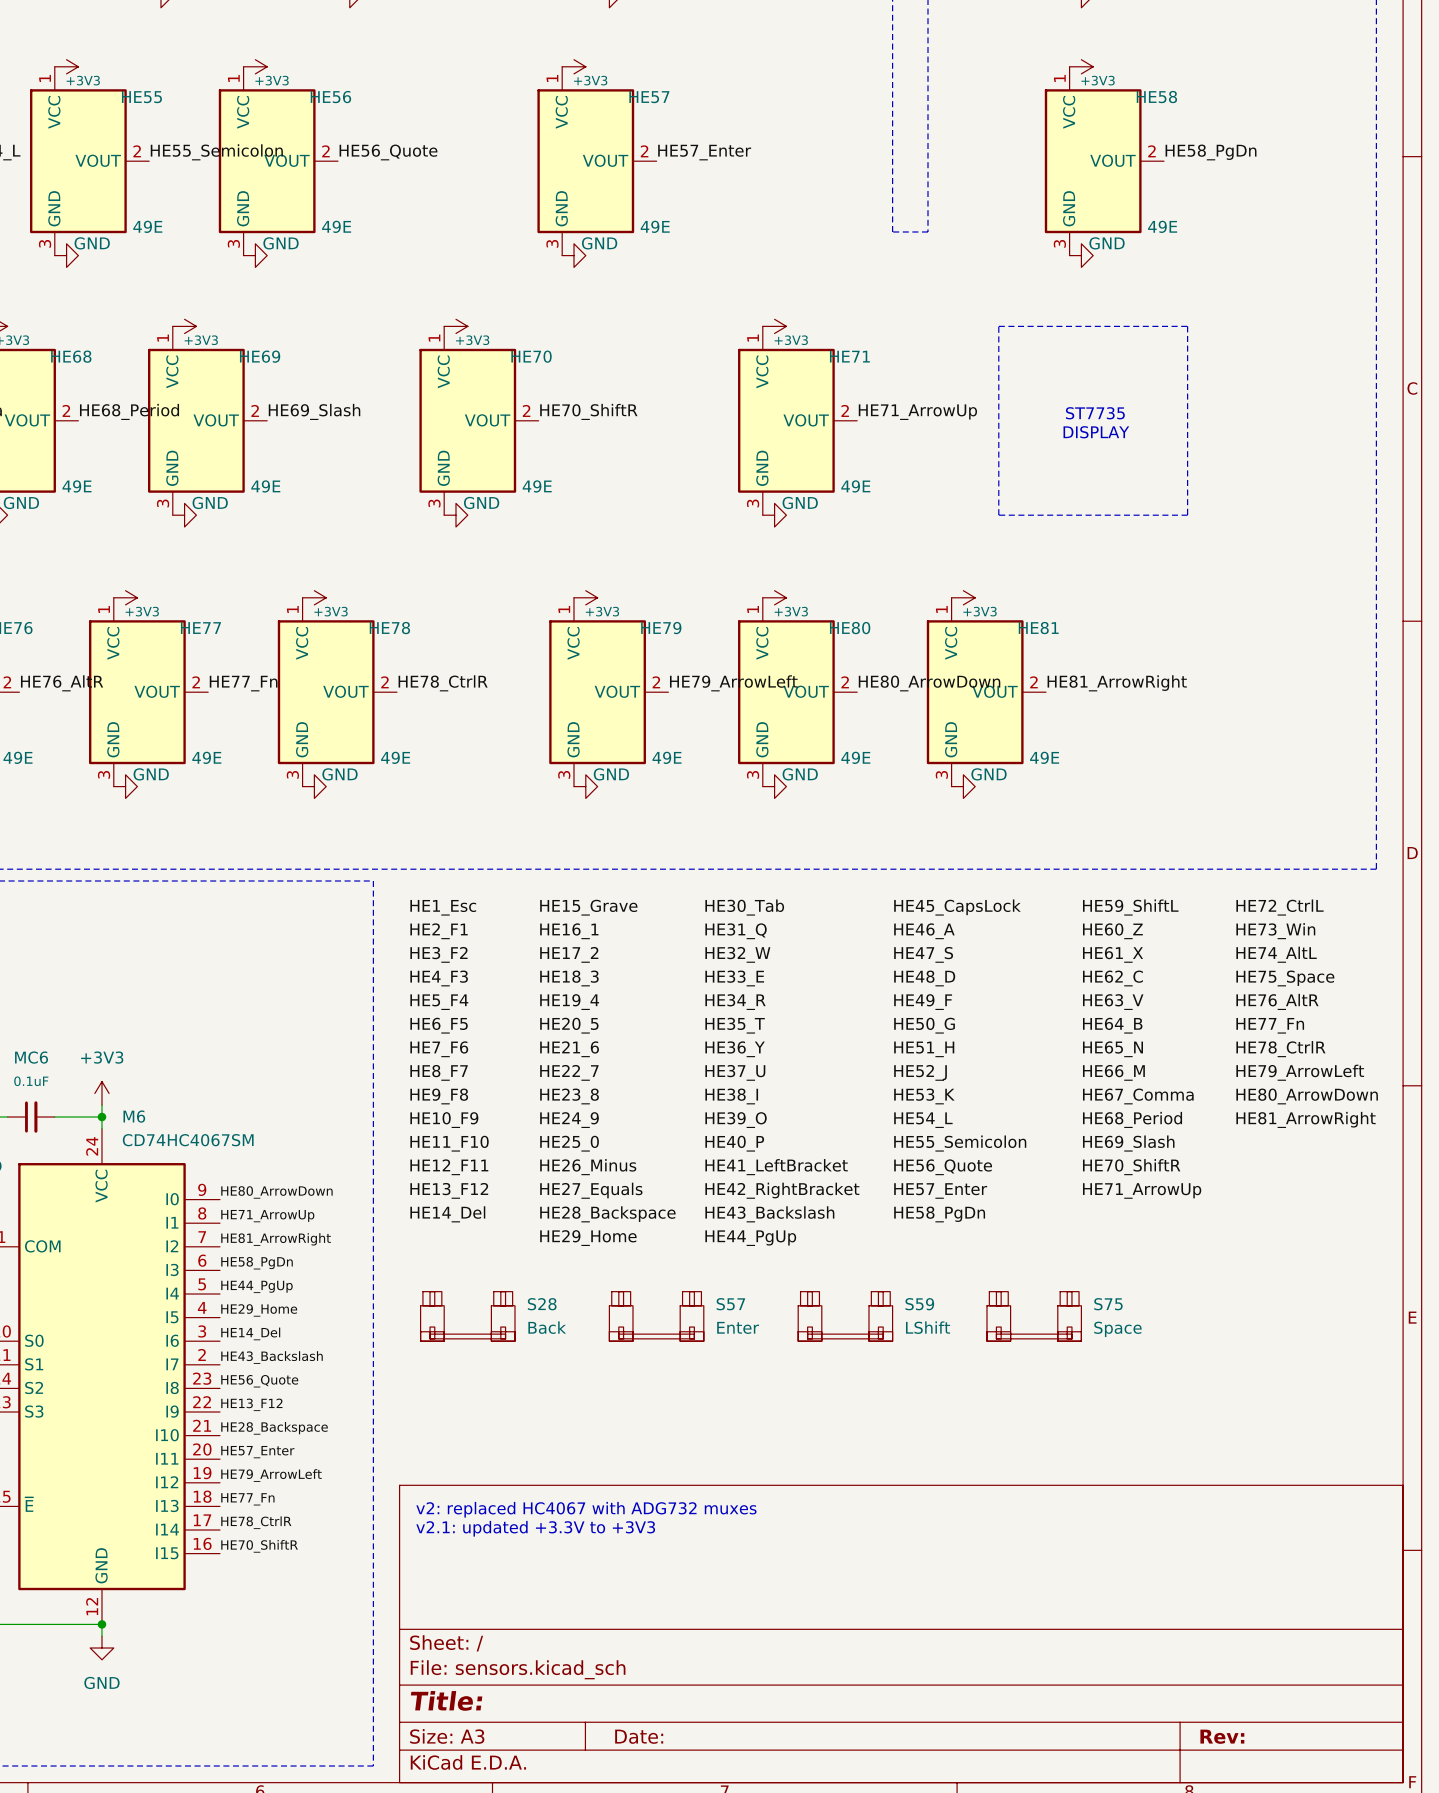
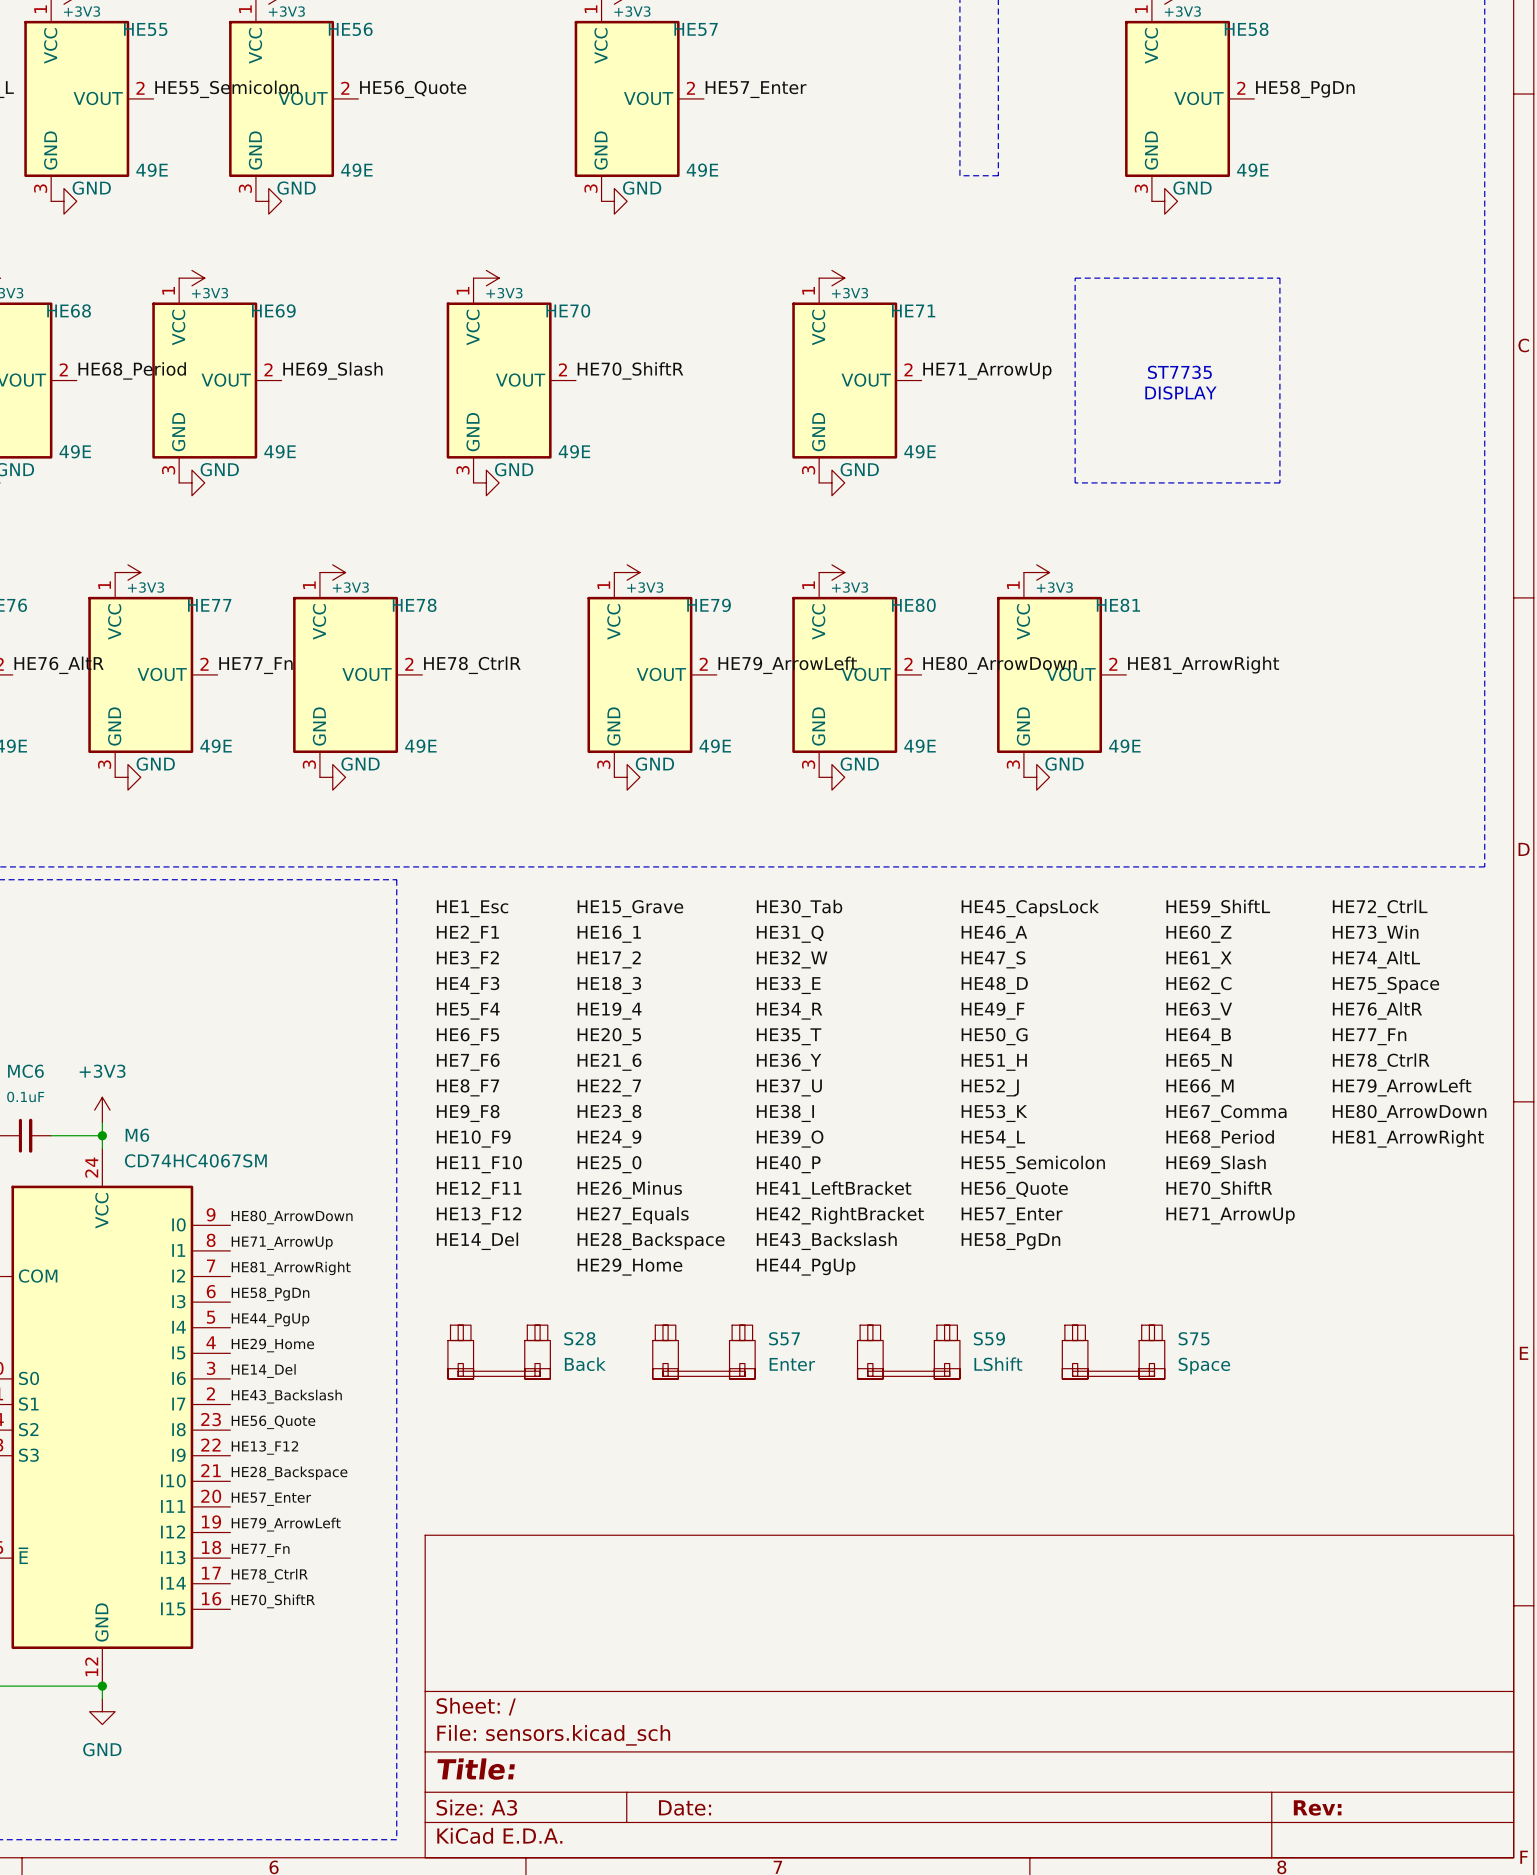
text: v2: replaced HC4067 with ADG732 muxes (586, 1509) -> none
text: v2.1: updated +3.3V to +3V3 (535, 1528) -> none

